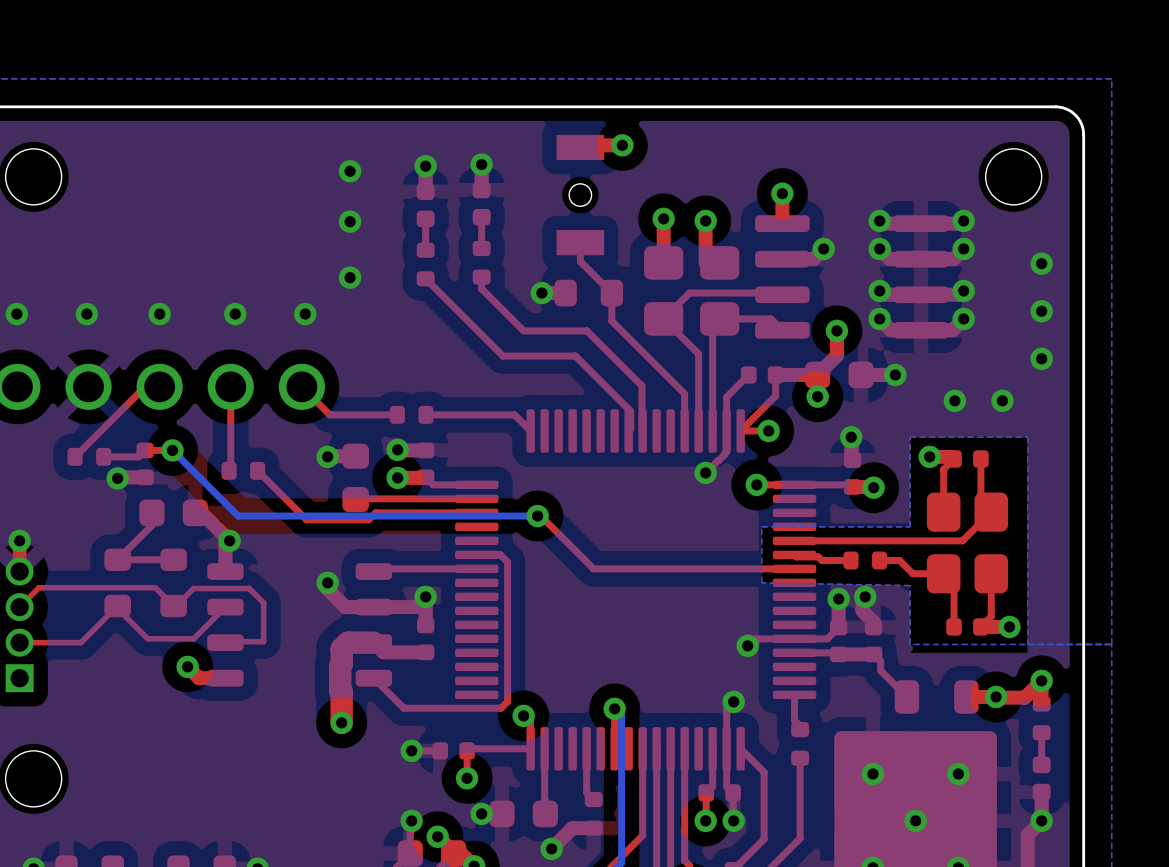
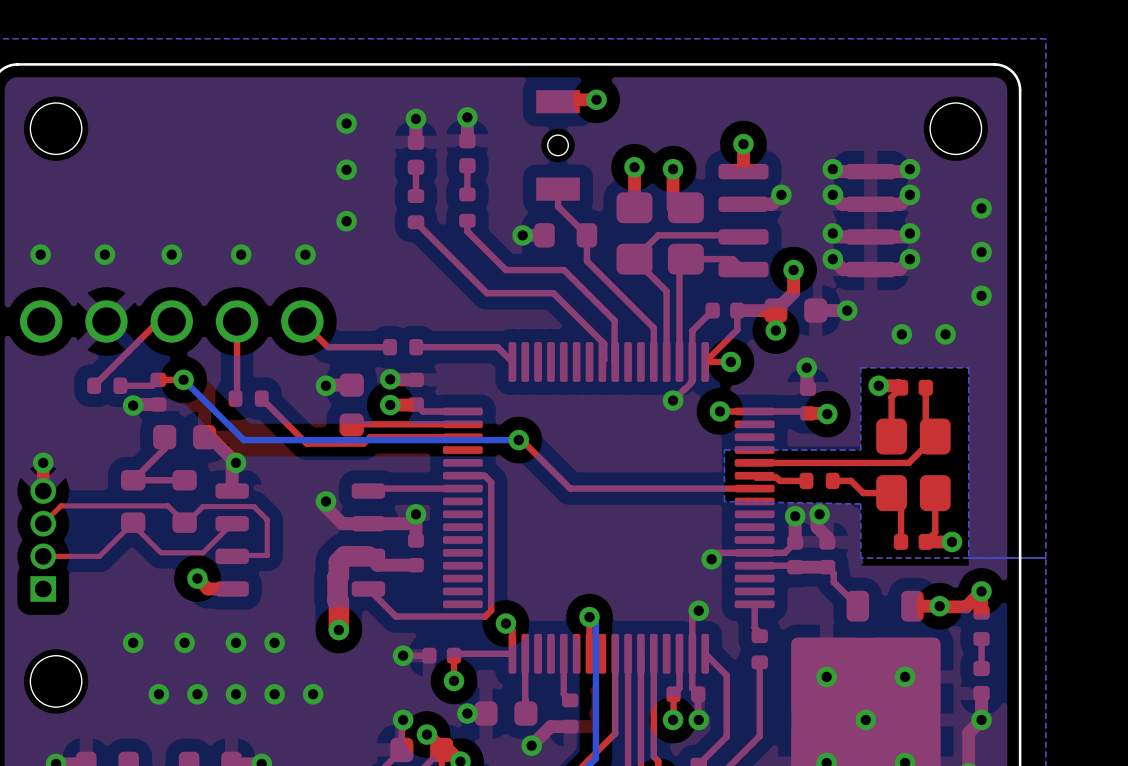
via: none -> (133, 642)
via: none -> (184, 642)
via: none -> (236, 642)
via: none -> (274, 642)
via: none -> (158, 694)
via: none -> (197, 694)
via: none -> (236, 694)
via: none -> (274, 694)
via: none -> (313, 694)

